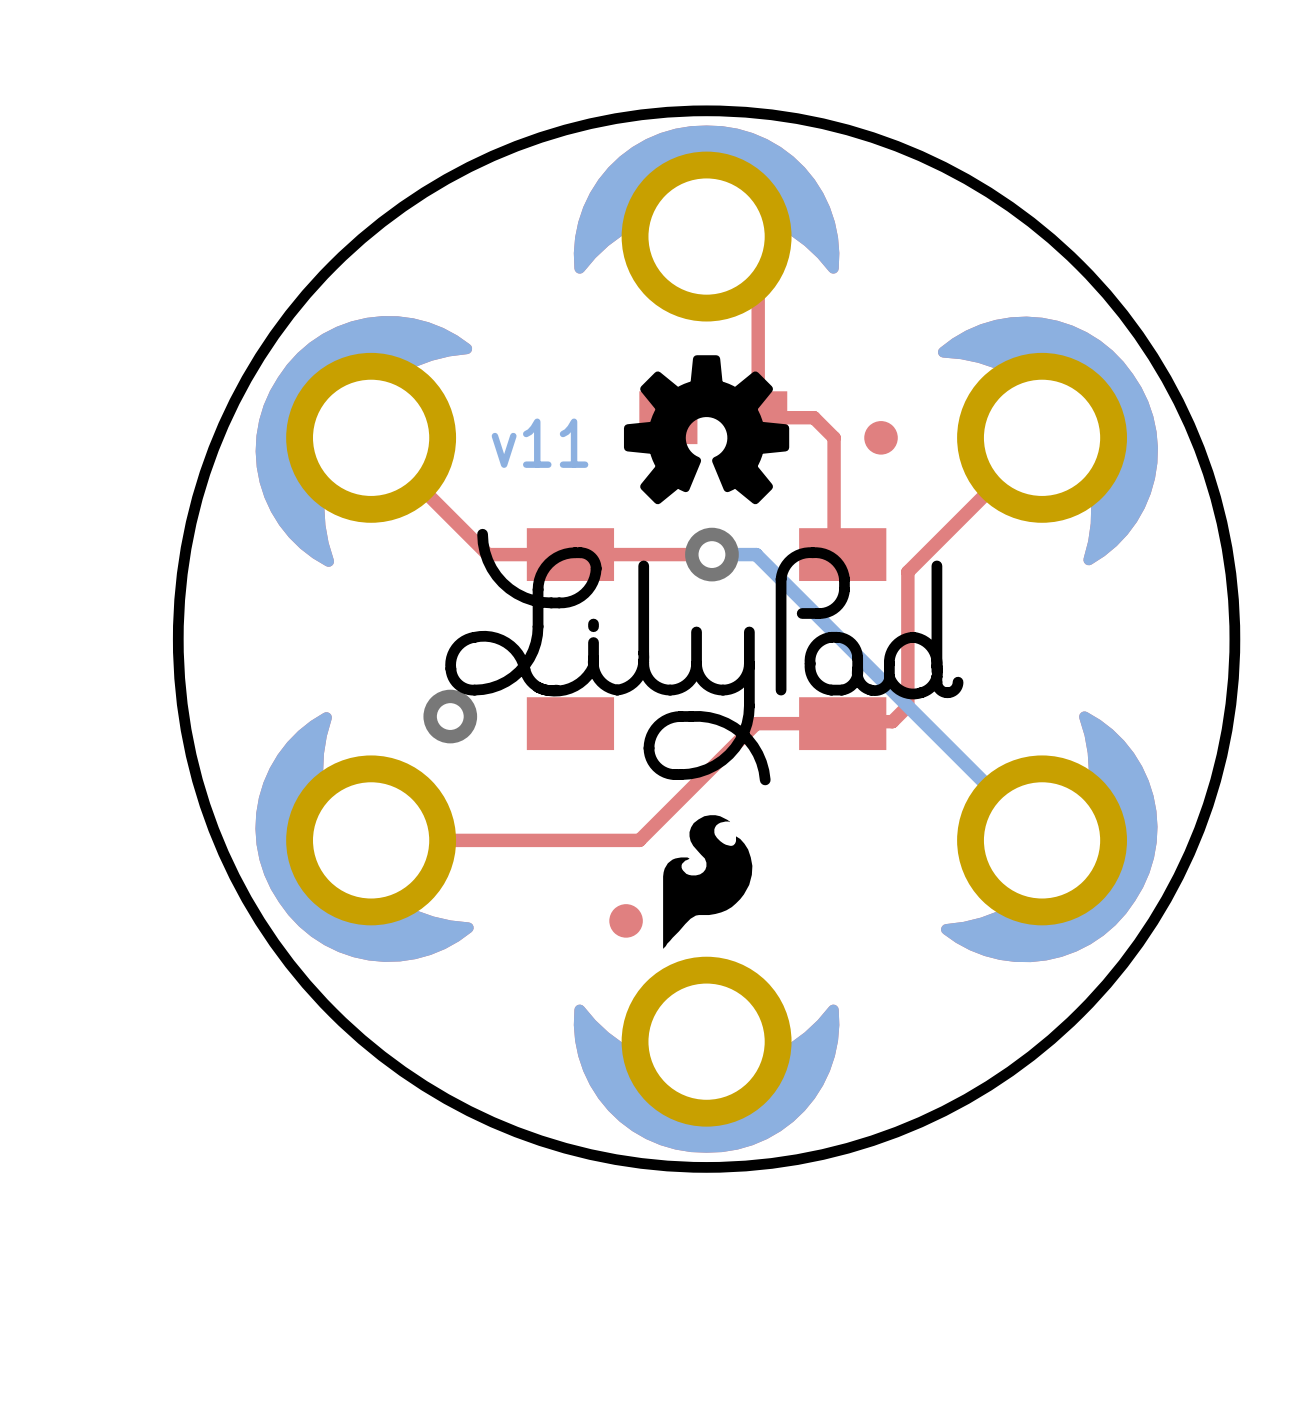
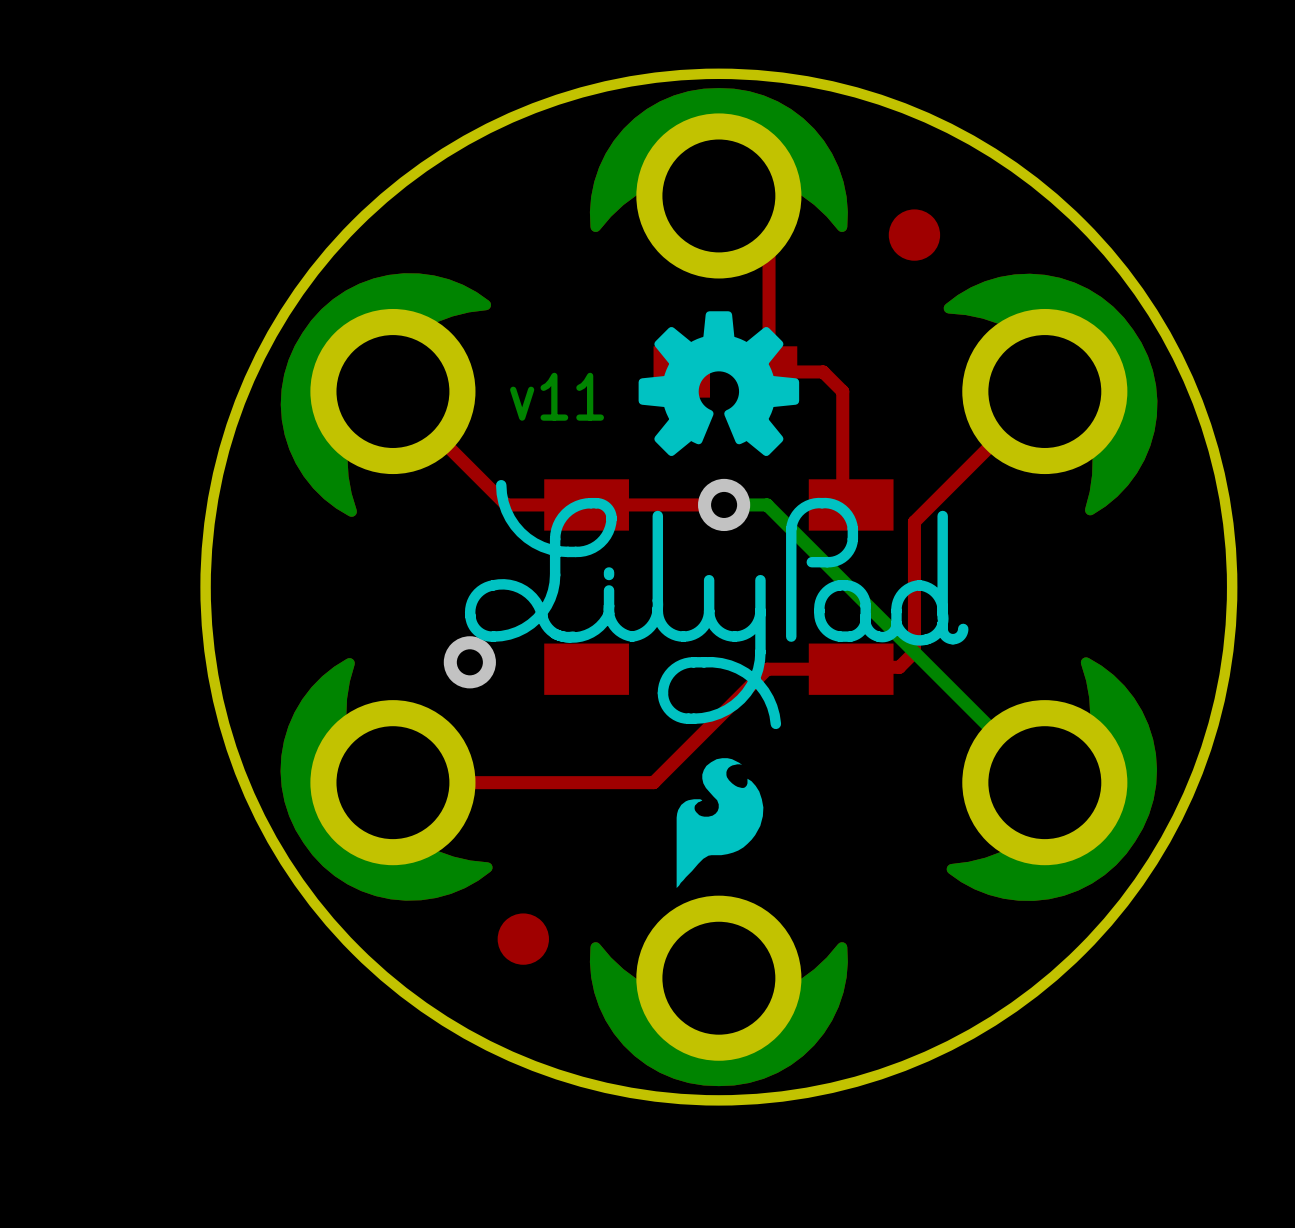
part: none -> (914, 235)
part: (881, 437) -> none
part: (626, 920) -> none
part: none -> (523, 939)

